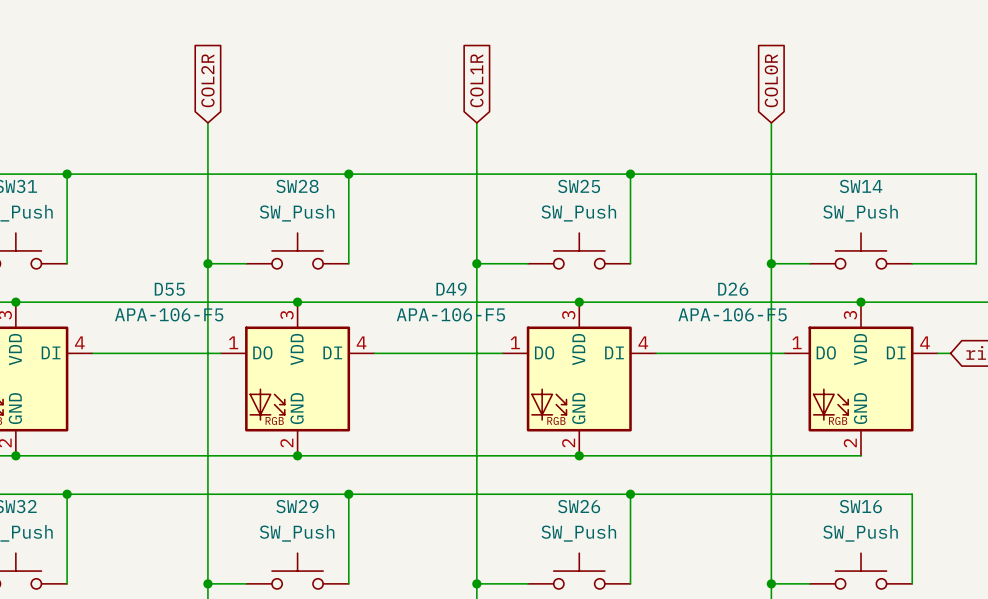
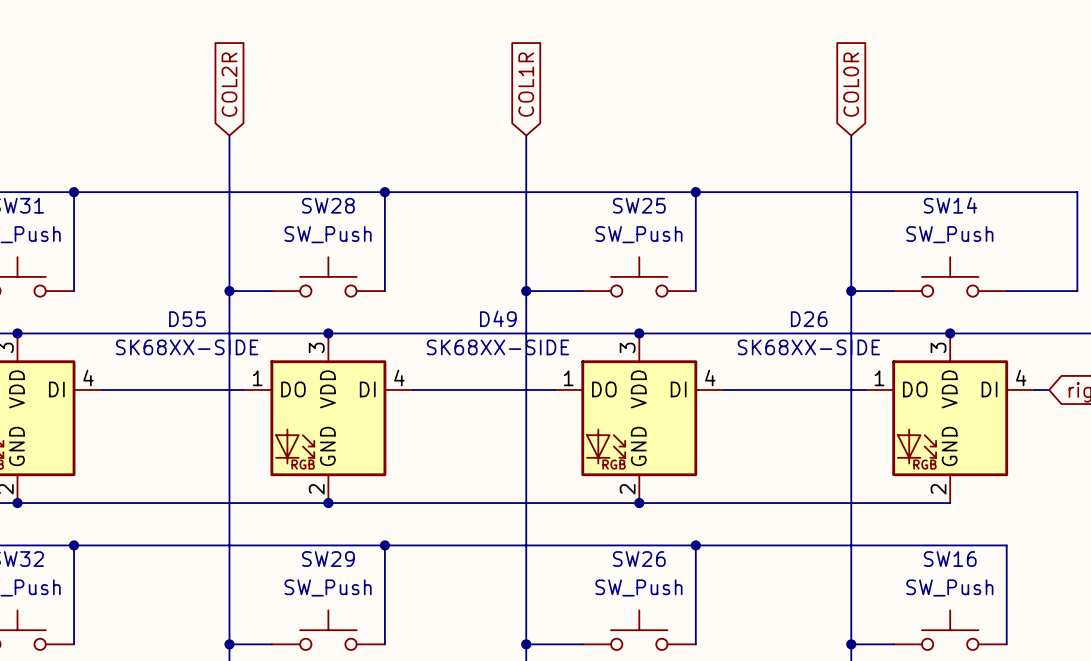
D55 value: APA-106-F5 (169, 314) -> SK68XX-SIDE (187, 347)
D49 value: APA-106-F5 (450, 314) -> SK68XX-SIDE (497, 347)
D26 value: APA-106-F5 (732, 314) -> SK68XX-SIDE (808, 347)

